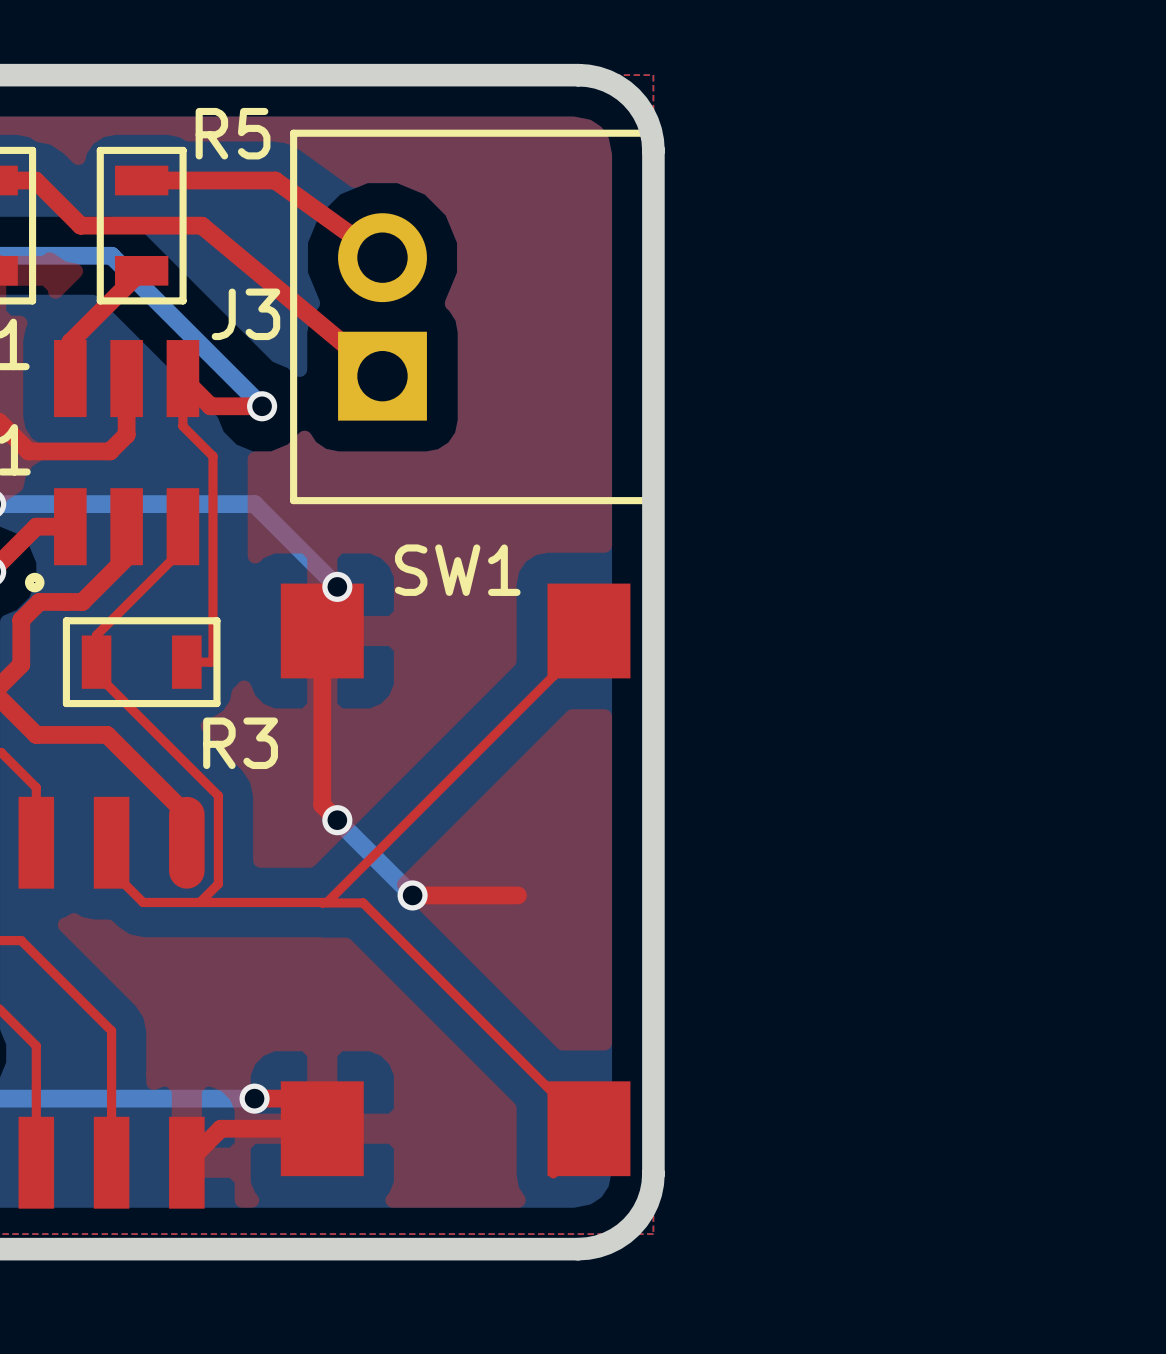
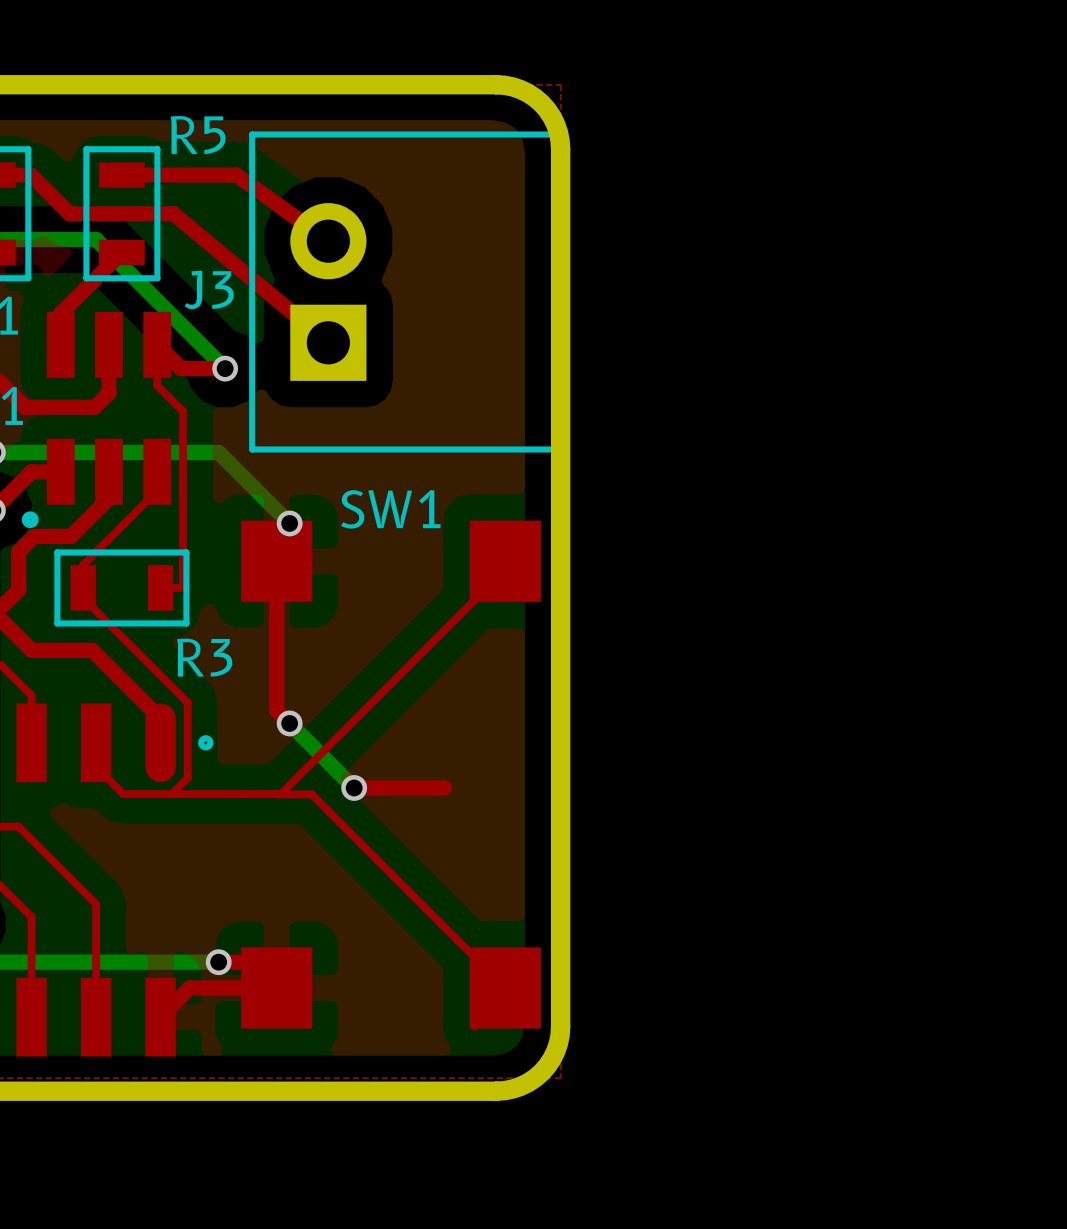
drawing: none -> [198, 735, 214, 751]

